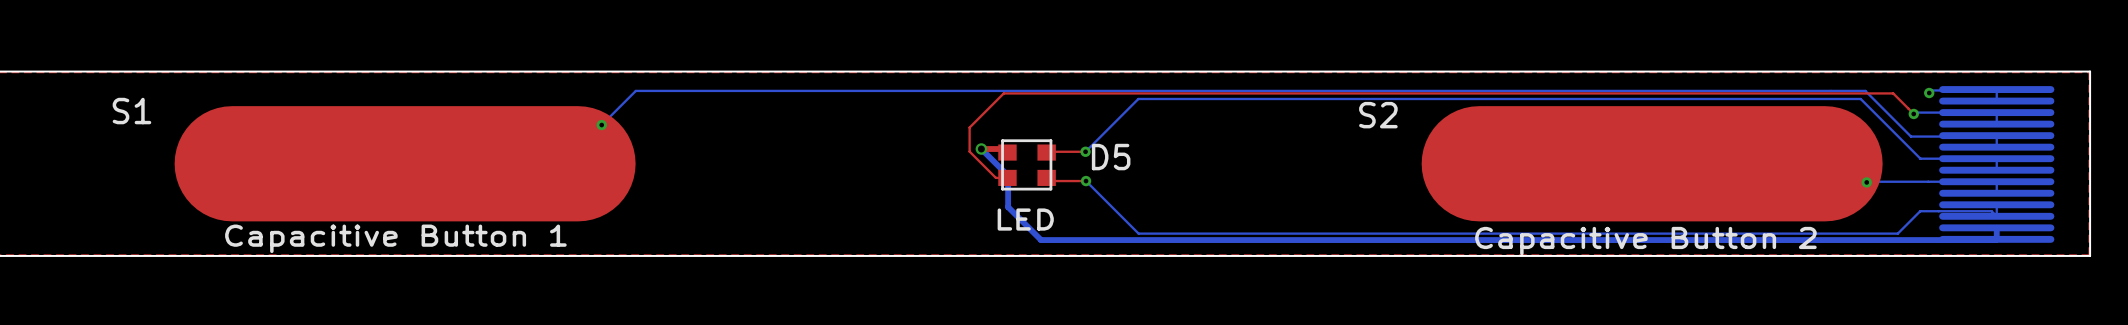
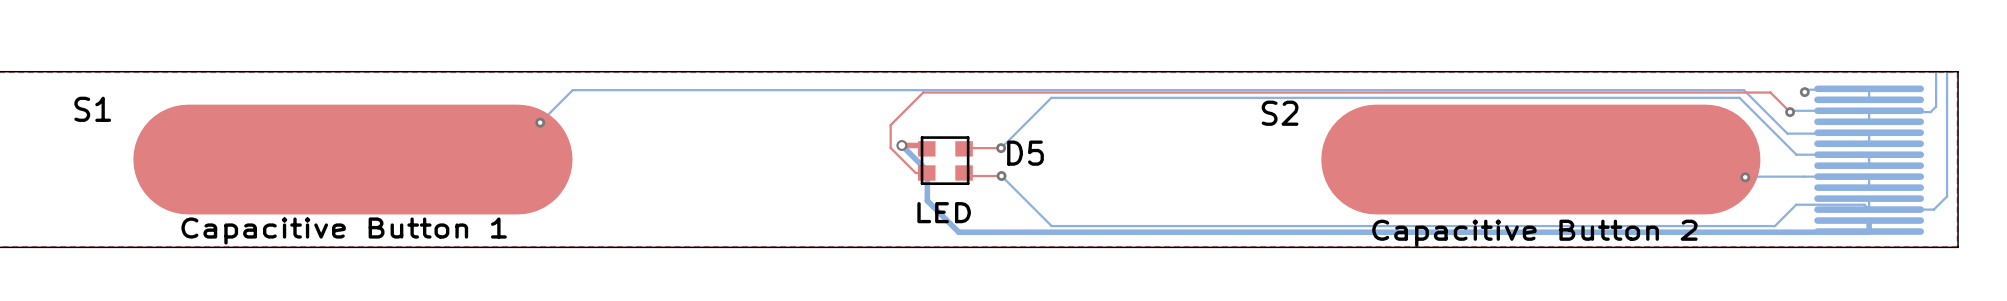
bottom track: none -> (1936, 71) (1936, 106) (1930, 112) (1870, 112)
bottom track: none -> (1947, 71) (1947, 196) (1933, 209) (1869, 209)

